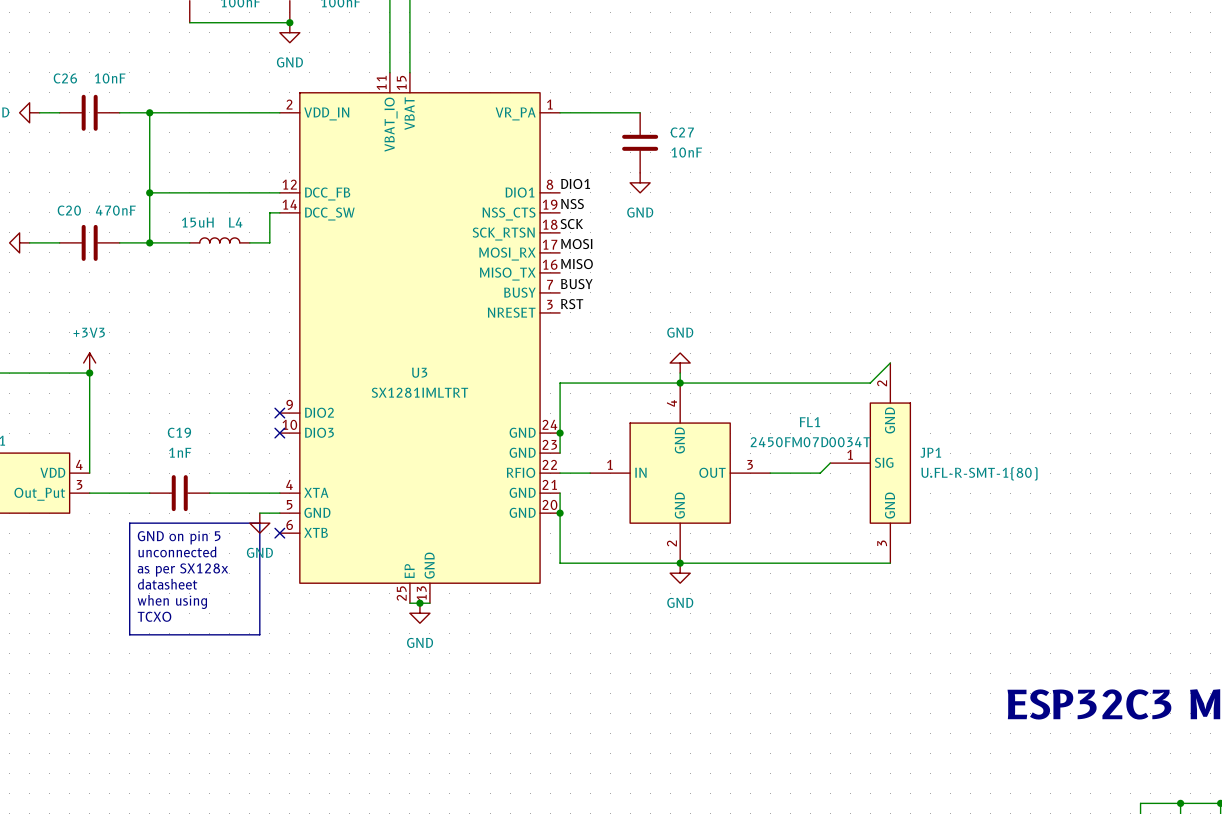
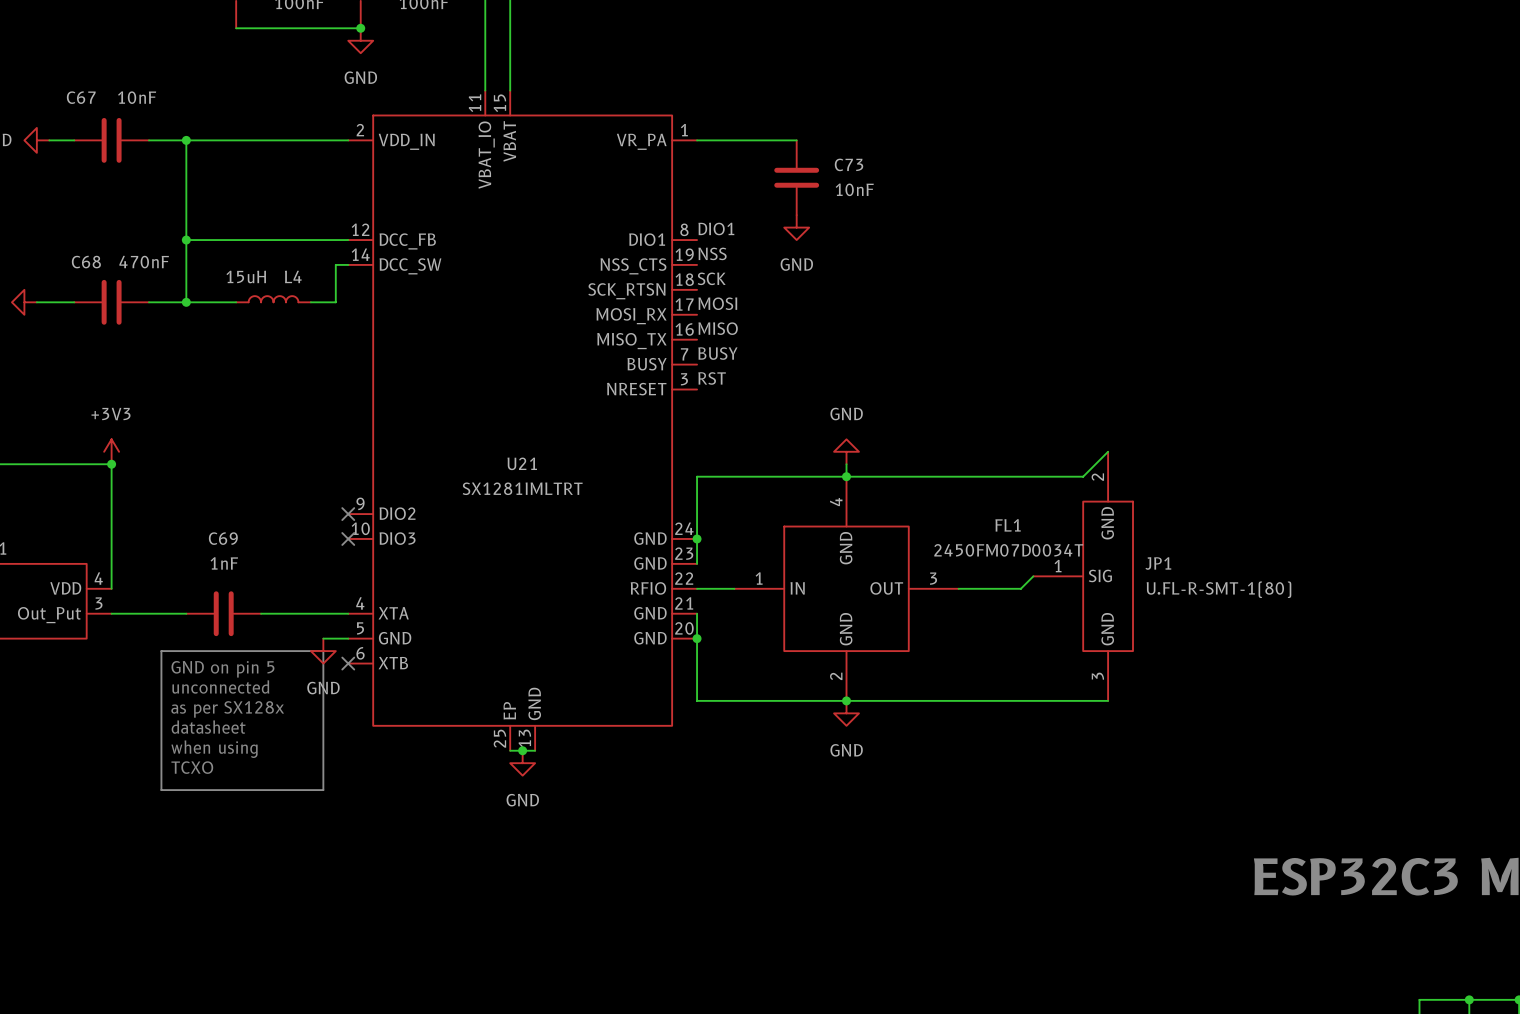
C26 name: C26 (65, 78) -> C67 (81, 97)
C27 name: C27 (682, 132) -> C73 (849, 164)
C20 name: C20 (69, 210) -> C68 (86, 262)
U3 name: U3 (419, 372) -> U21 (522, 463)
C19 name: C19 (179, 432) -> C69 (223, 538)

